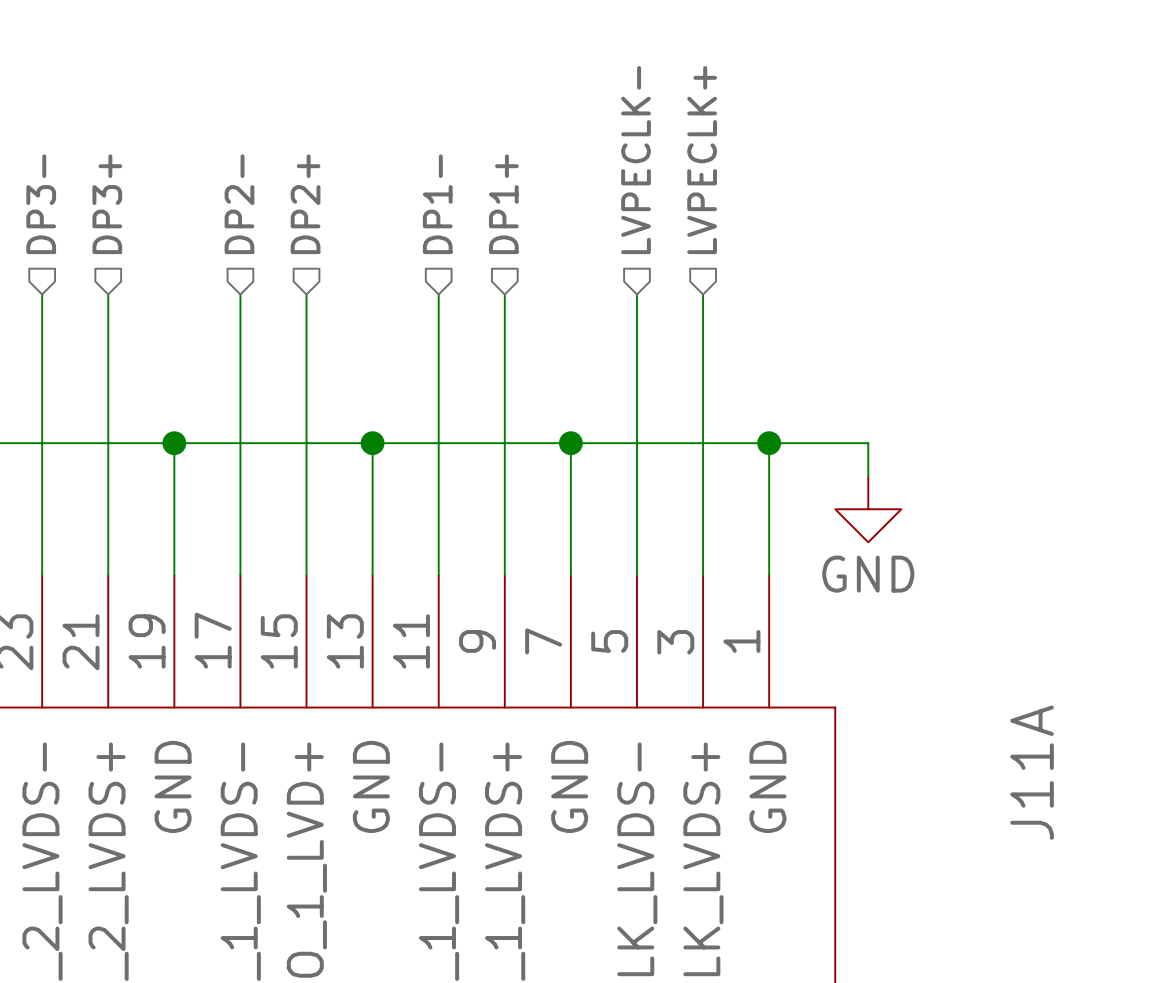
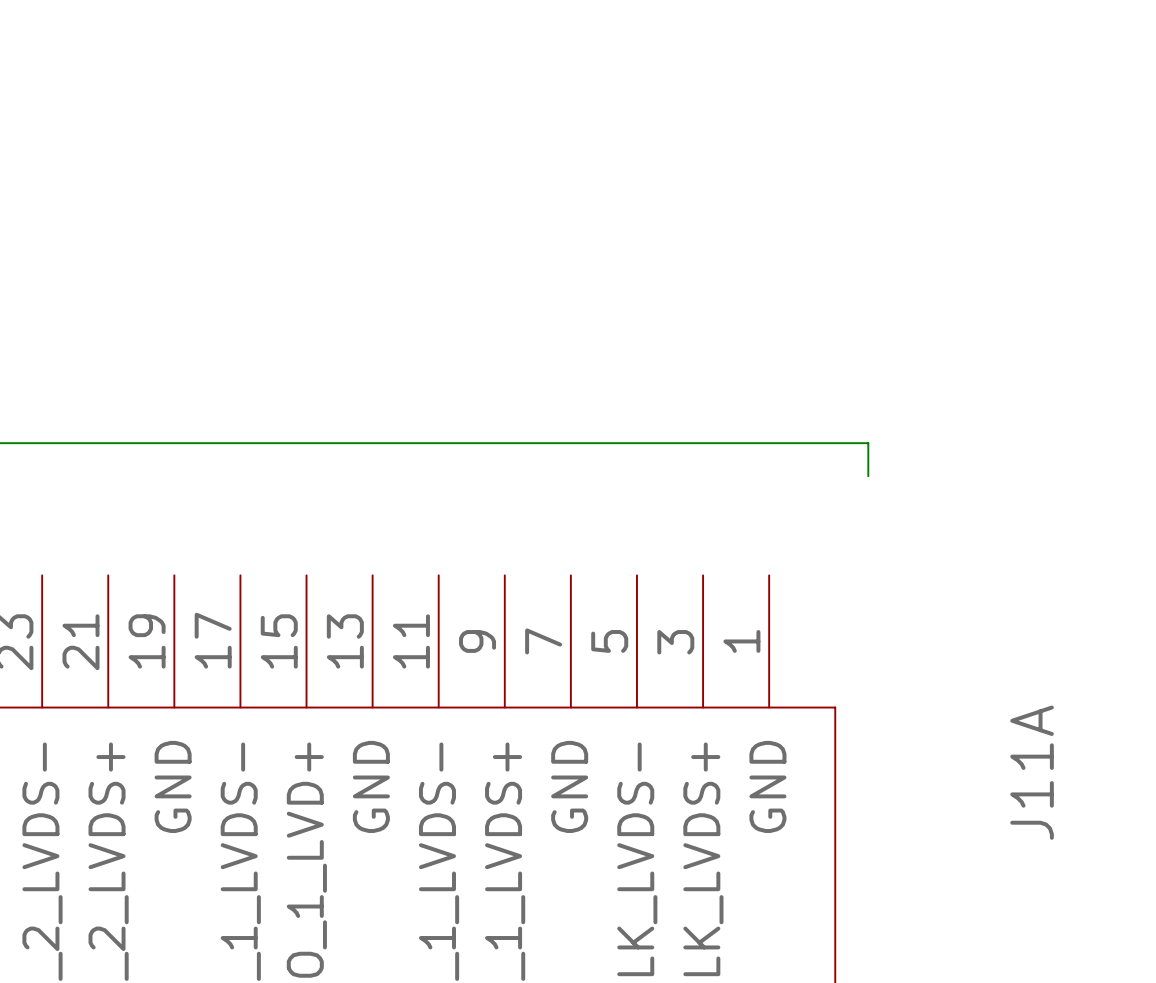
hierarchical label: LVPECLK- (636, 160) -> none
hierarchical label: LVPECLK+ (702, 160) -> none
hierarchical label: DP3- (41, 204) -> none
hierarchical label: DP3+ (107, 204) -> none
hierarchical label: DP2- (239, 204) -> none
hierarchical label: DP2+ (305, 204) -> none
hierarchical label: DP1- (437, 204) -> none
hierarchical label: DP1+ (503, 204) -> none
wire: (42, 294) (42, 575) -> none
wire: (108, 294) (108, 575) -> none
wire: (240, 294) (240, 575) -> none
wire: (306, 294) (306, 575) -> none
wire: (438, 294) (438, 575) -> none
wire: (504, 294) (504, 575) -> none
wire: (636, 294) (636, 575) -> none
wire: (703, 294) (703, 575) -> none
wire: (174, 443) (174, 575) -> none
junction: (174, 443) -> none
wire: (372, 443) (372, 575) -> none
junction: (372, 443) -> none
wire: (570, 443) (570, 575) -> none
junction: (570, 443) -> none
wire: (769, 443) (769, 575) -> none
junction: (769, 443) -> none
power symbol: GND (868, 509) -> none

